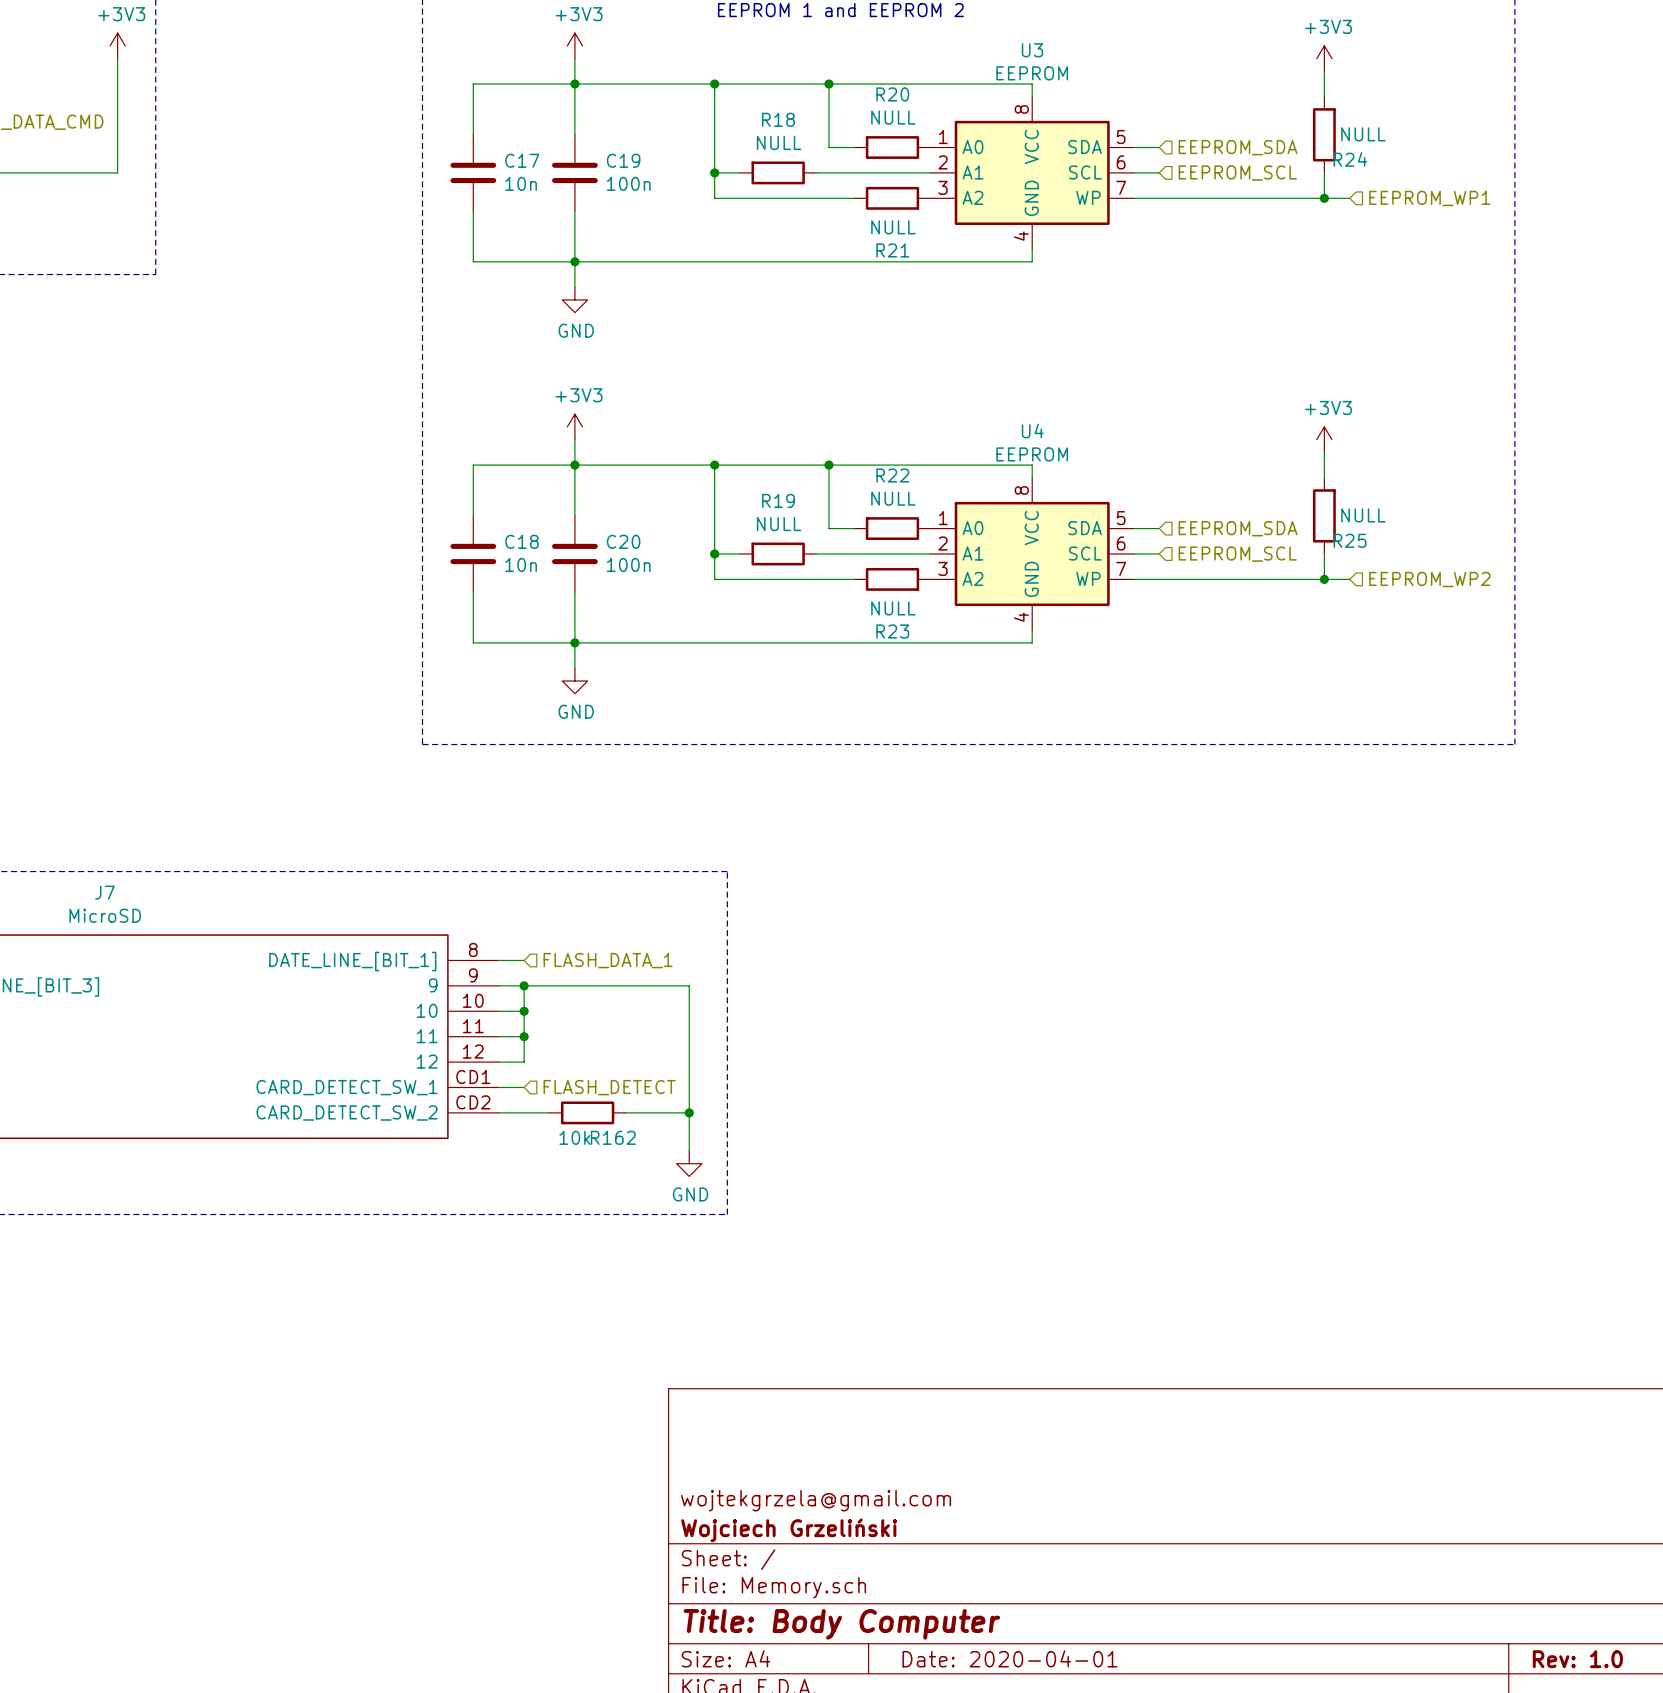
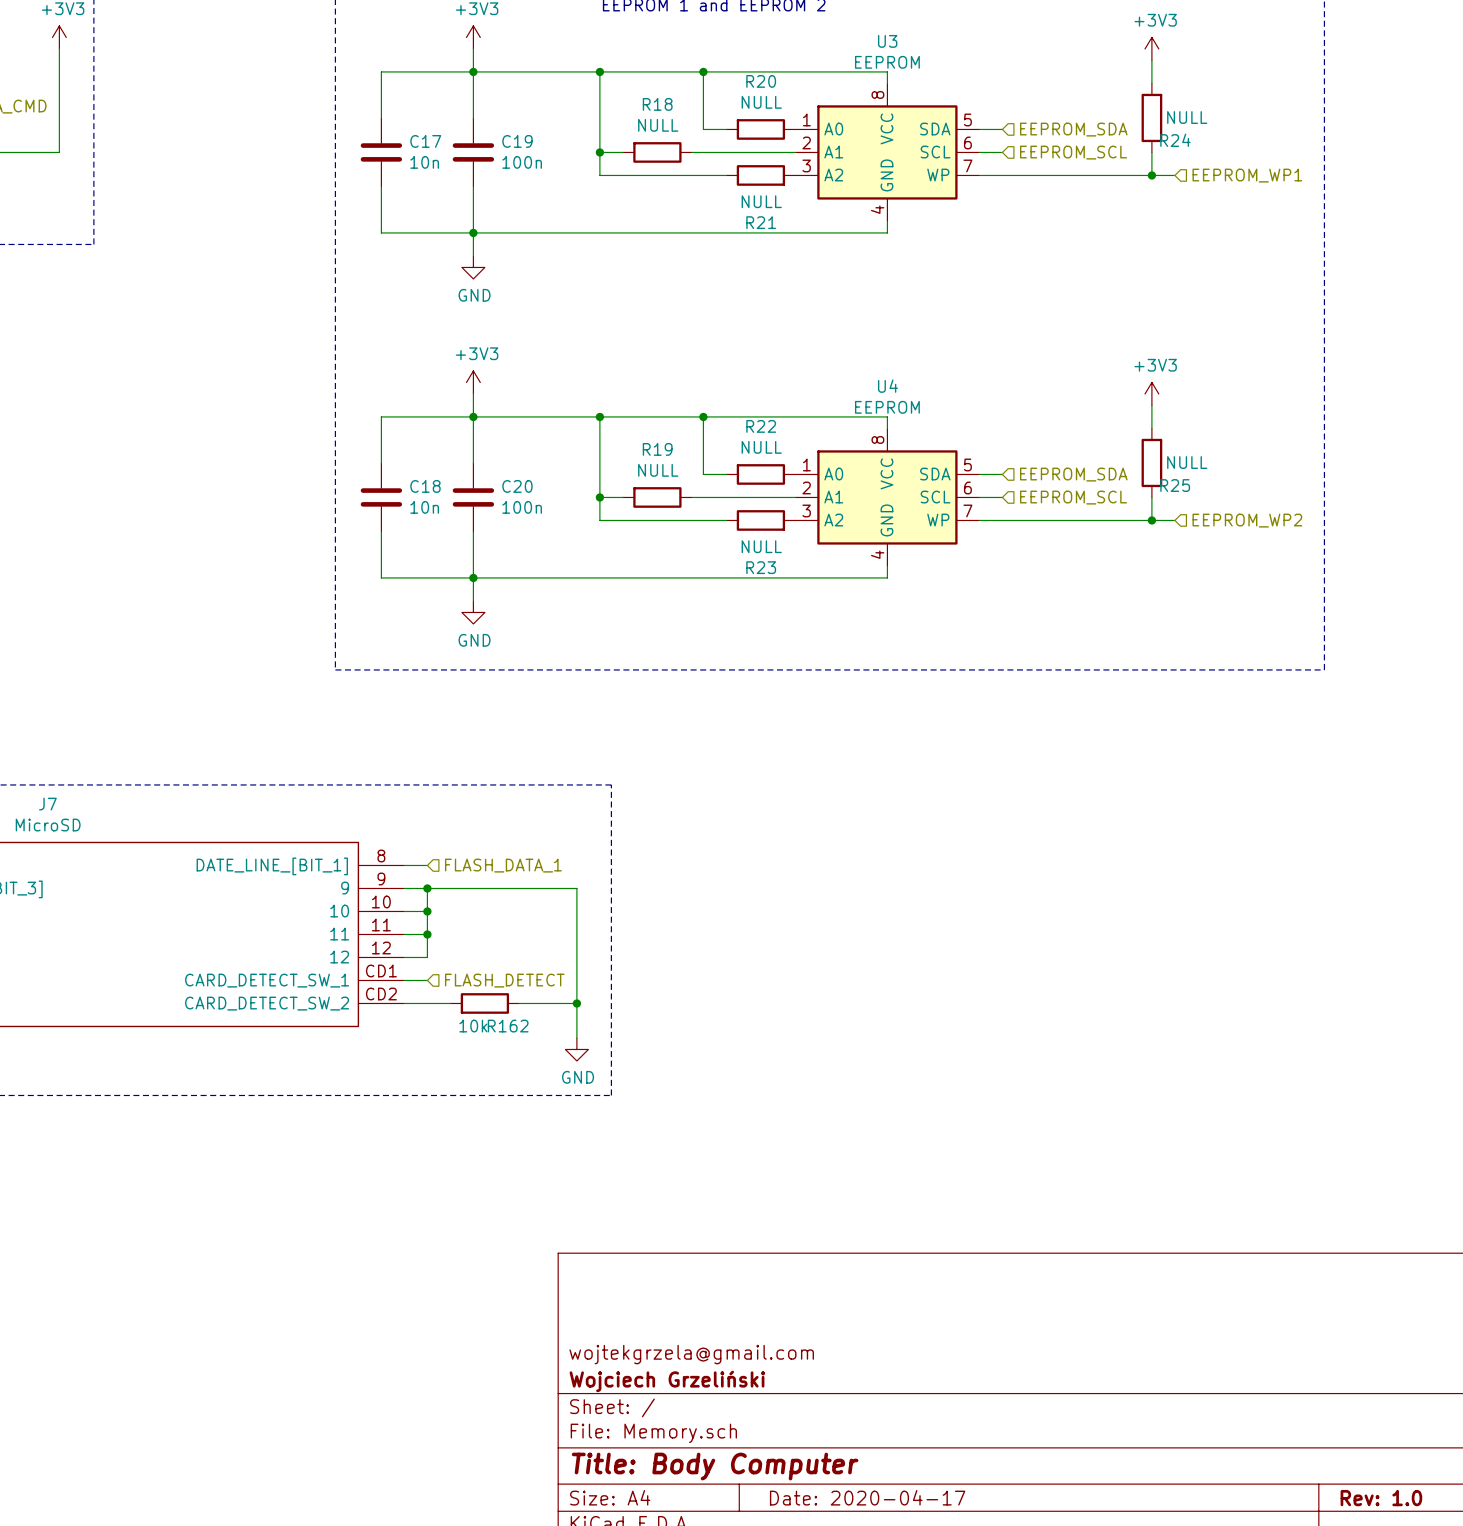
title block: Date: 2020-04-01 (1009, 1658) -> Date: 2020-04-17 (867, 1497)

